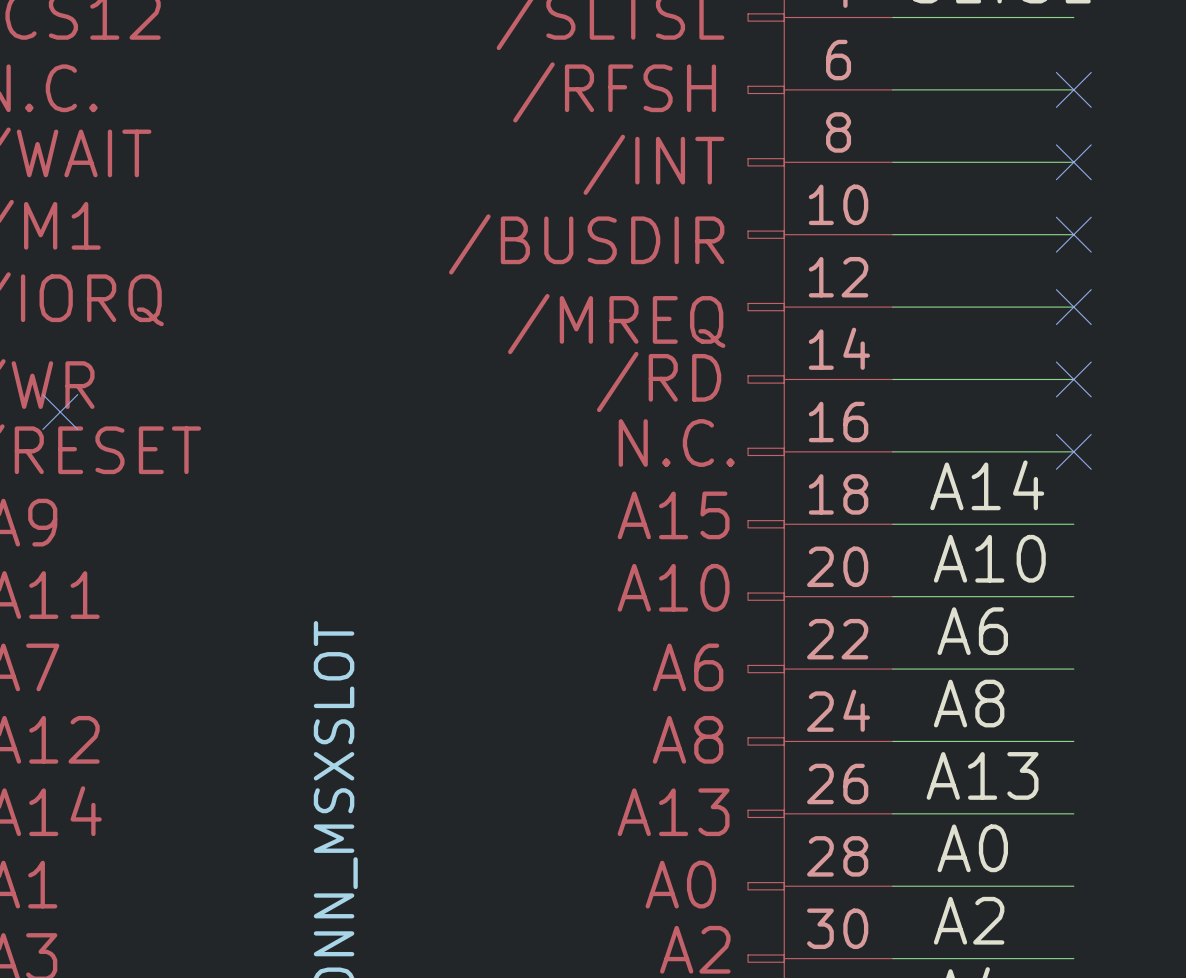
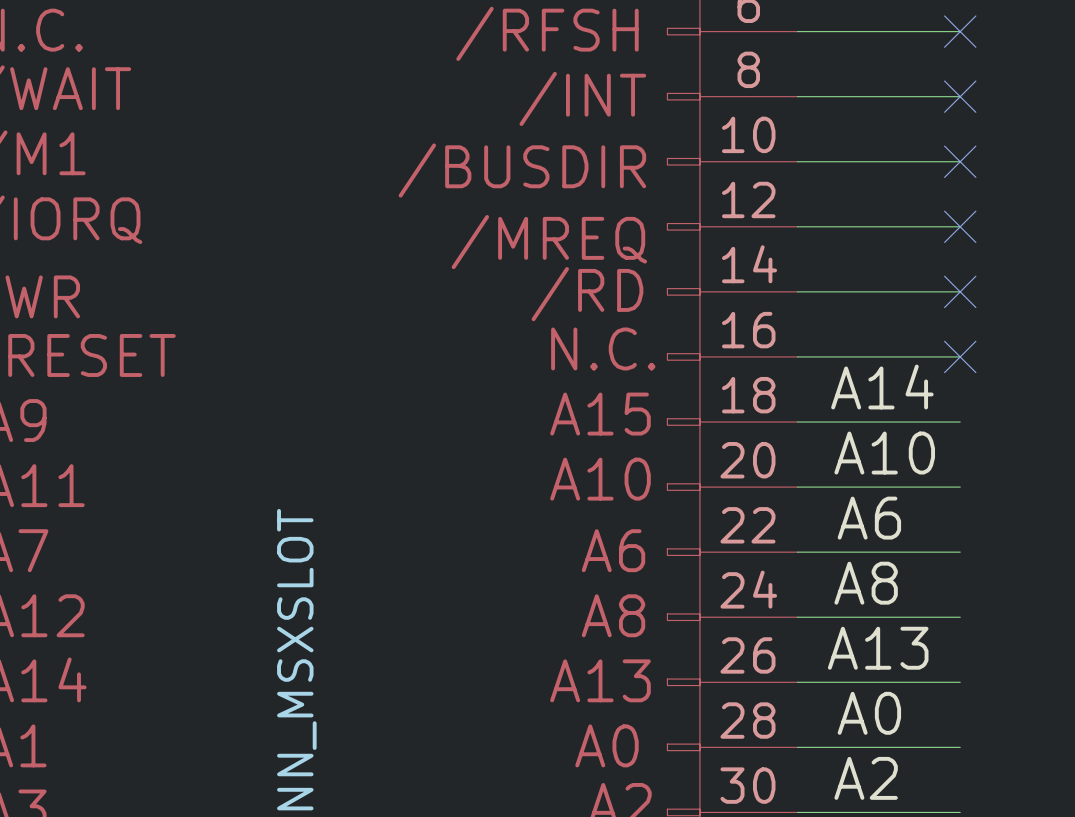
no-connect mark: (60, 412) -> none

